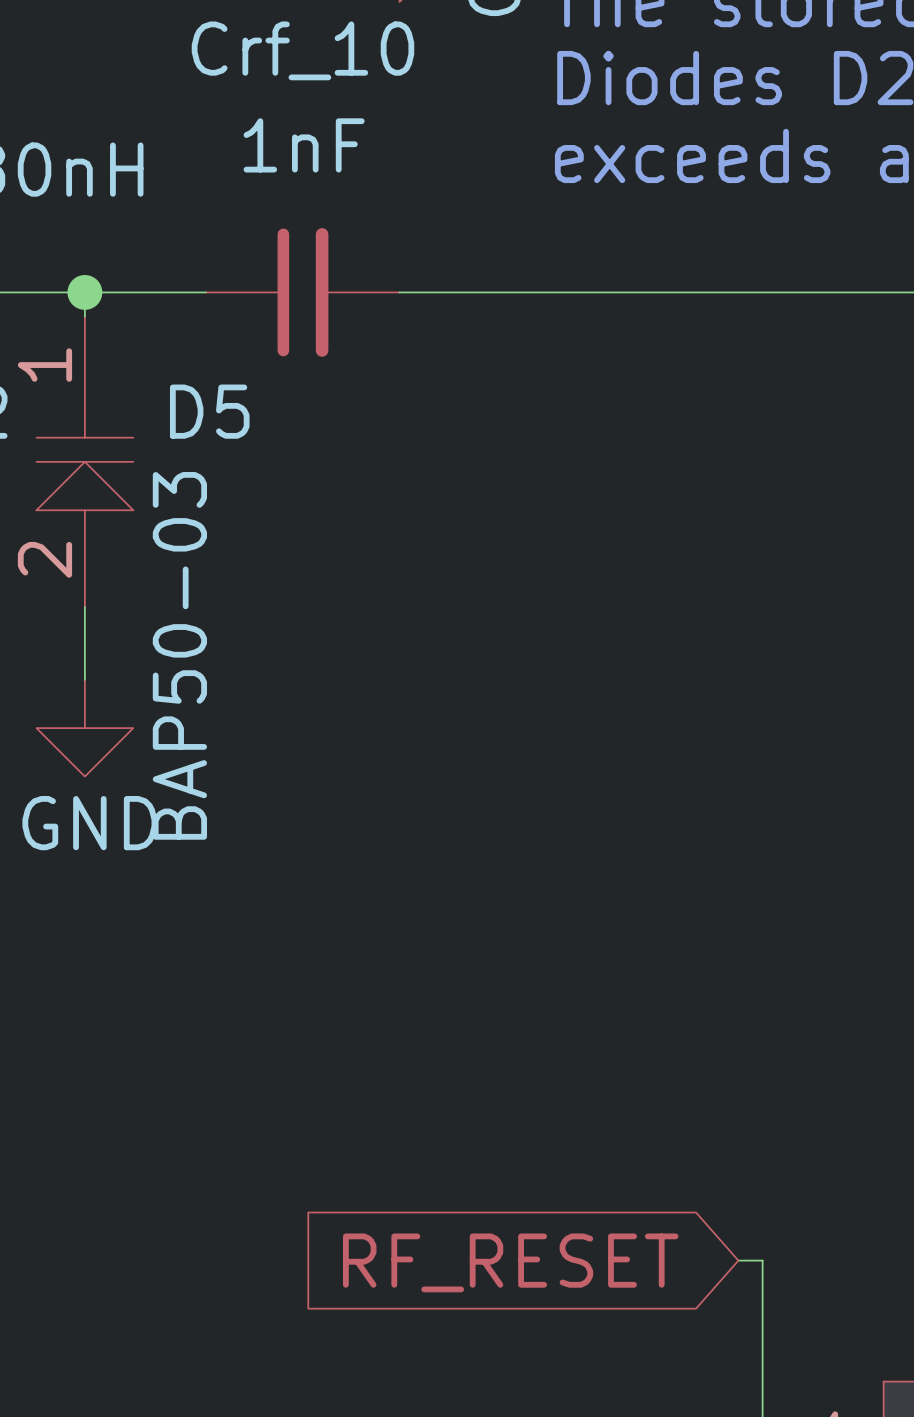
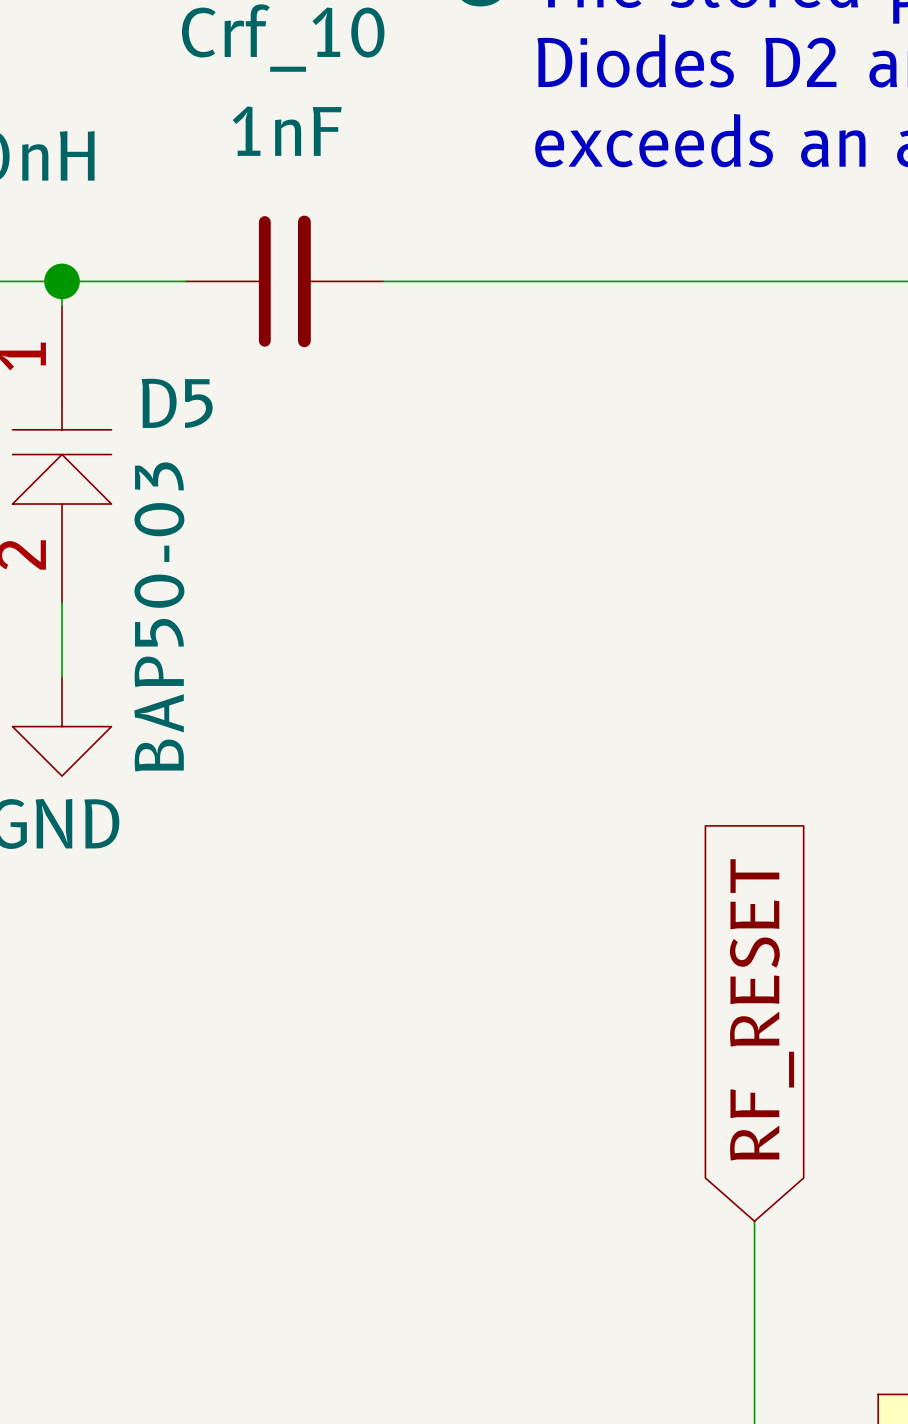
wire: (738, 1260) (762, 1260) -> (754, 1221) (754, 1270)
global label rotation: 0° (510, 1262) -> 90° clockwise (762, 1009)

